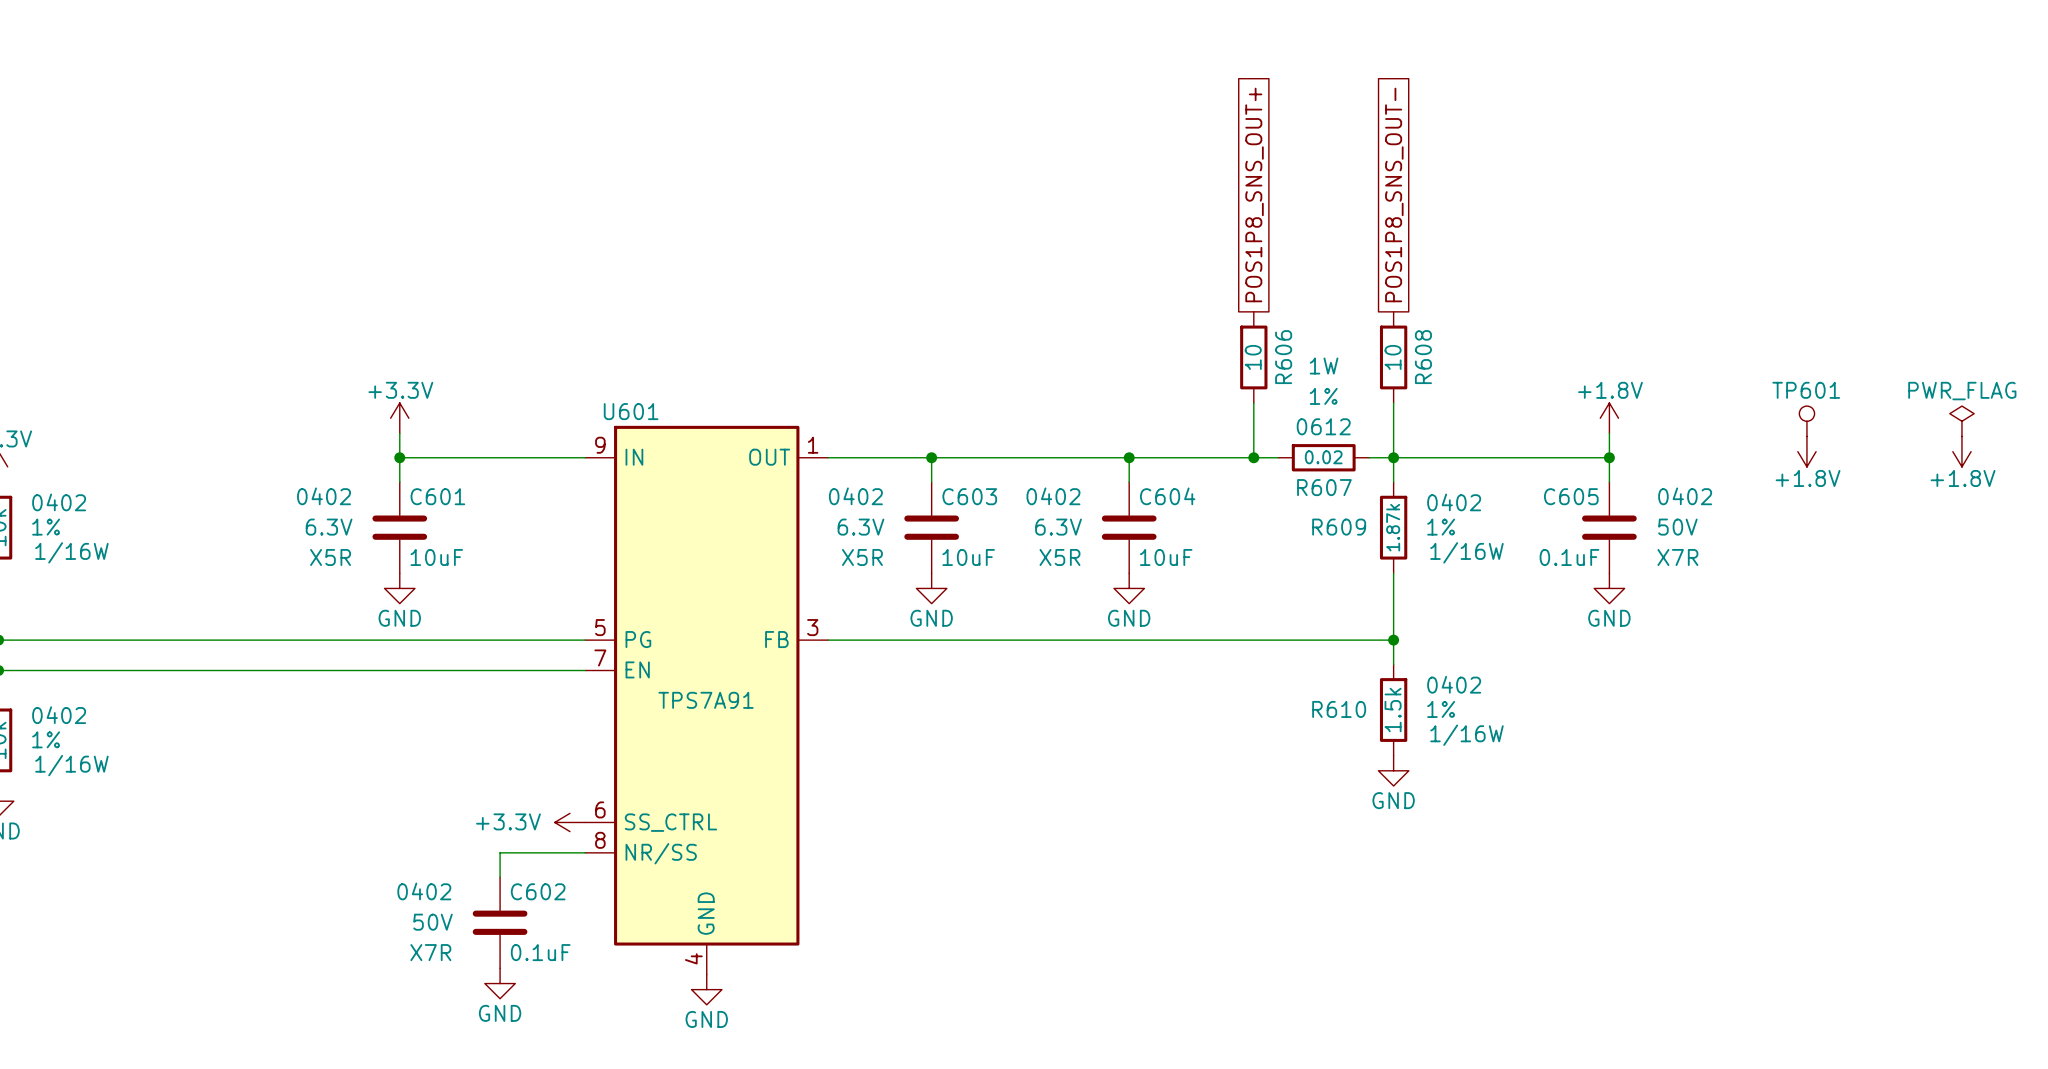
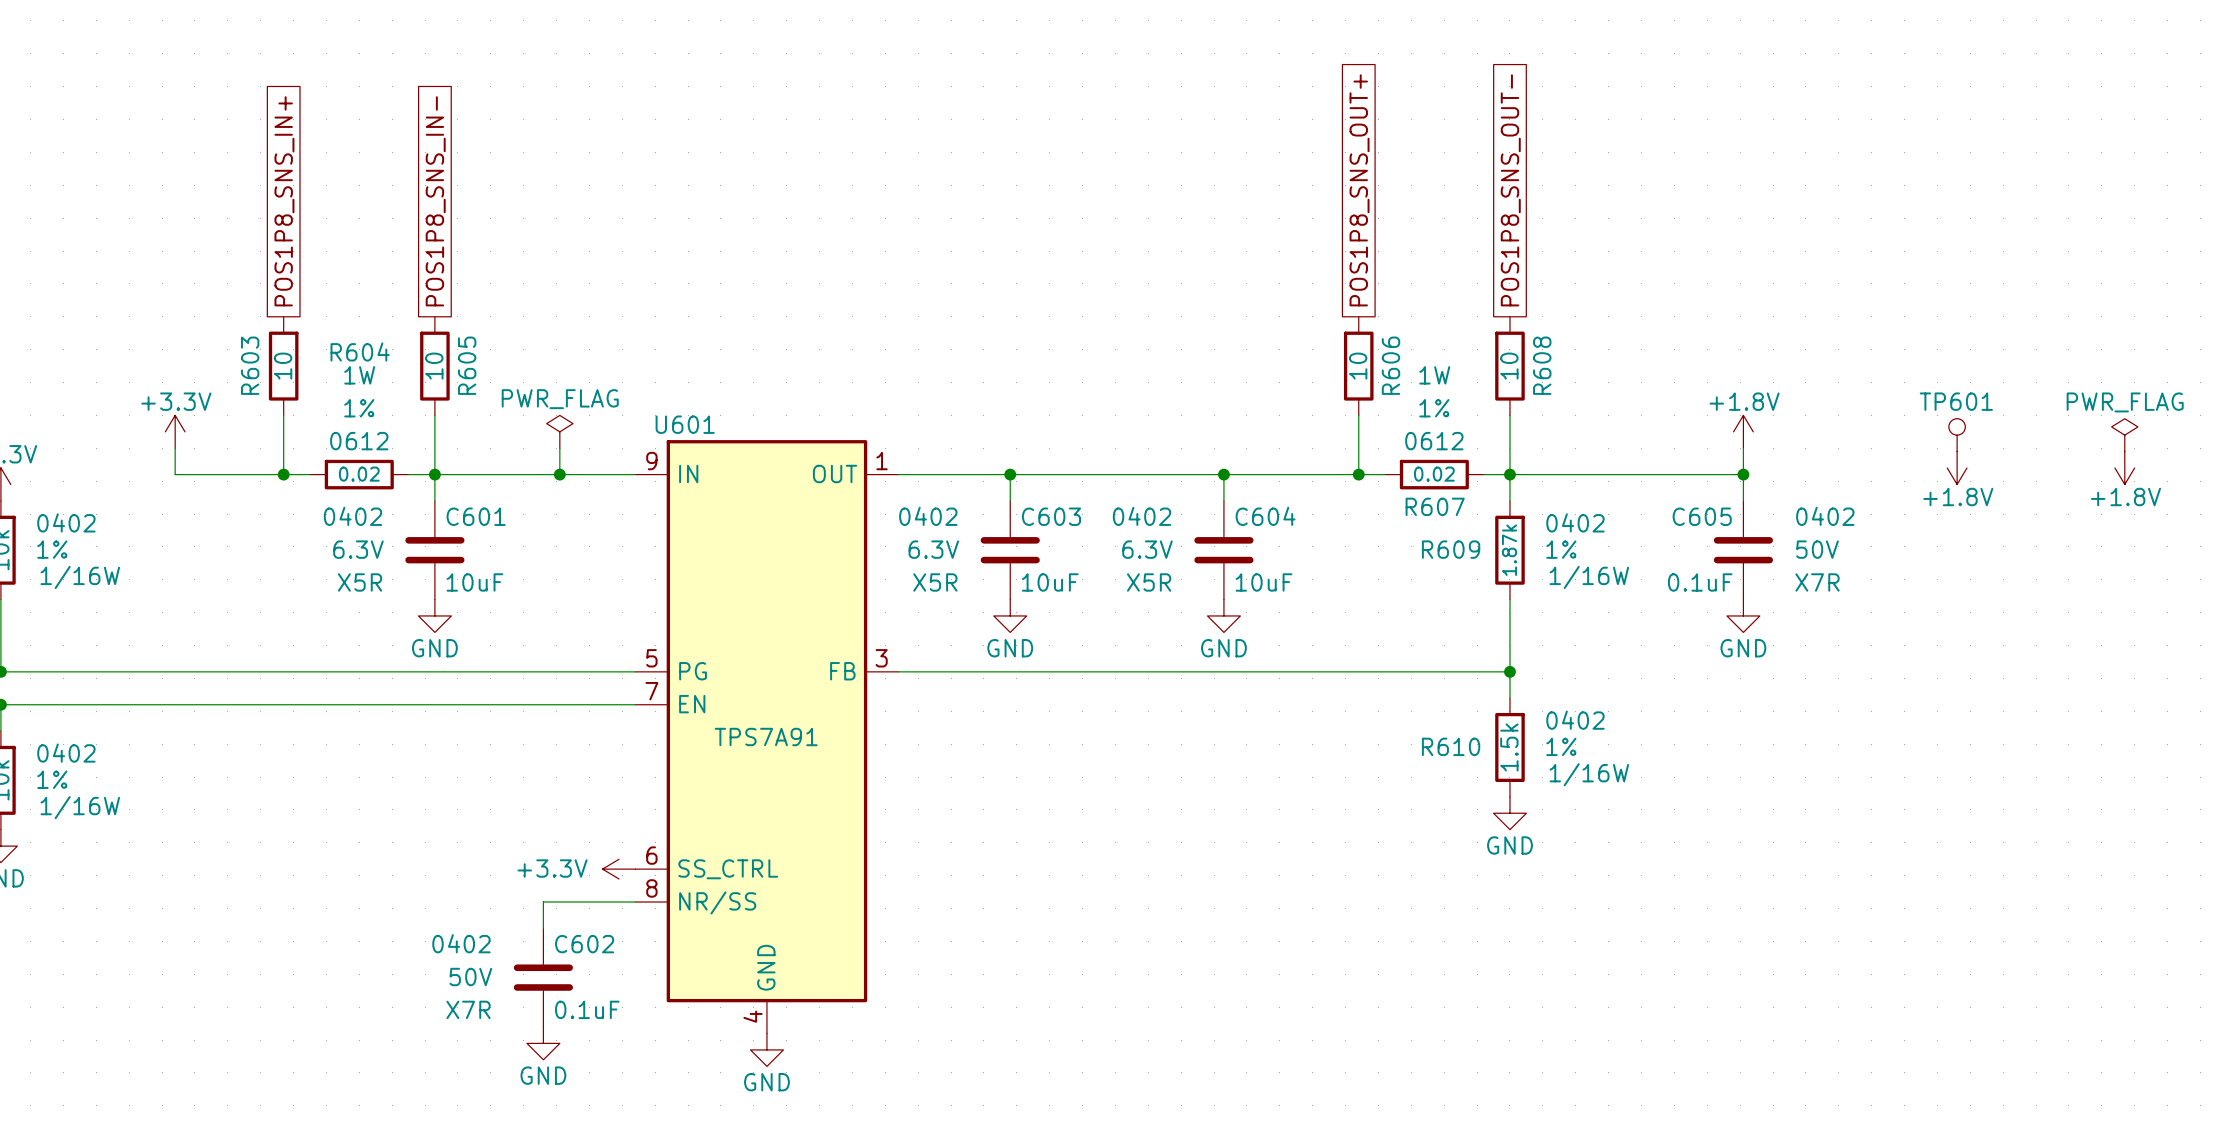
global label: none -> POS1P8_SNS_IN+ (284, 201)
global label: none -> POS1P8_SNS_IN- (435, 201)
R603: none -> 10 (283, 366)
R605: none -> 10 (434, 366)
wire: none -> (283, 415) (283, 474)
power symbol position: +3.3V (399, 418) -> +3.3V (175, 431)
power symbol: none -> PWR_FLAG (559, 431)
wire: none -> (175, 448) (175, 474) (309, 474)
wire: none -> (559, 448) (559, 474)
junction: none -> (283, 474)
R604: none -> 0.02 (359, 474)
wire: none -> (408, 474) (434, 474)
junction: none -> (559, 474)

